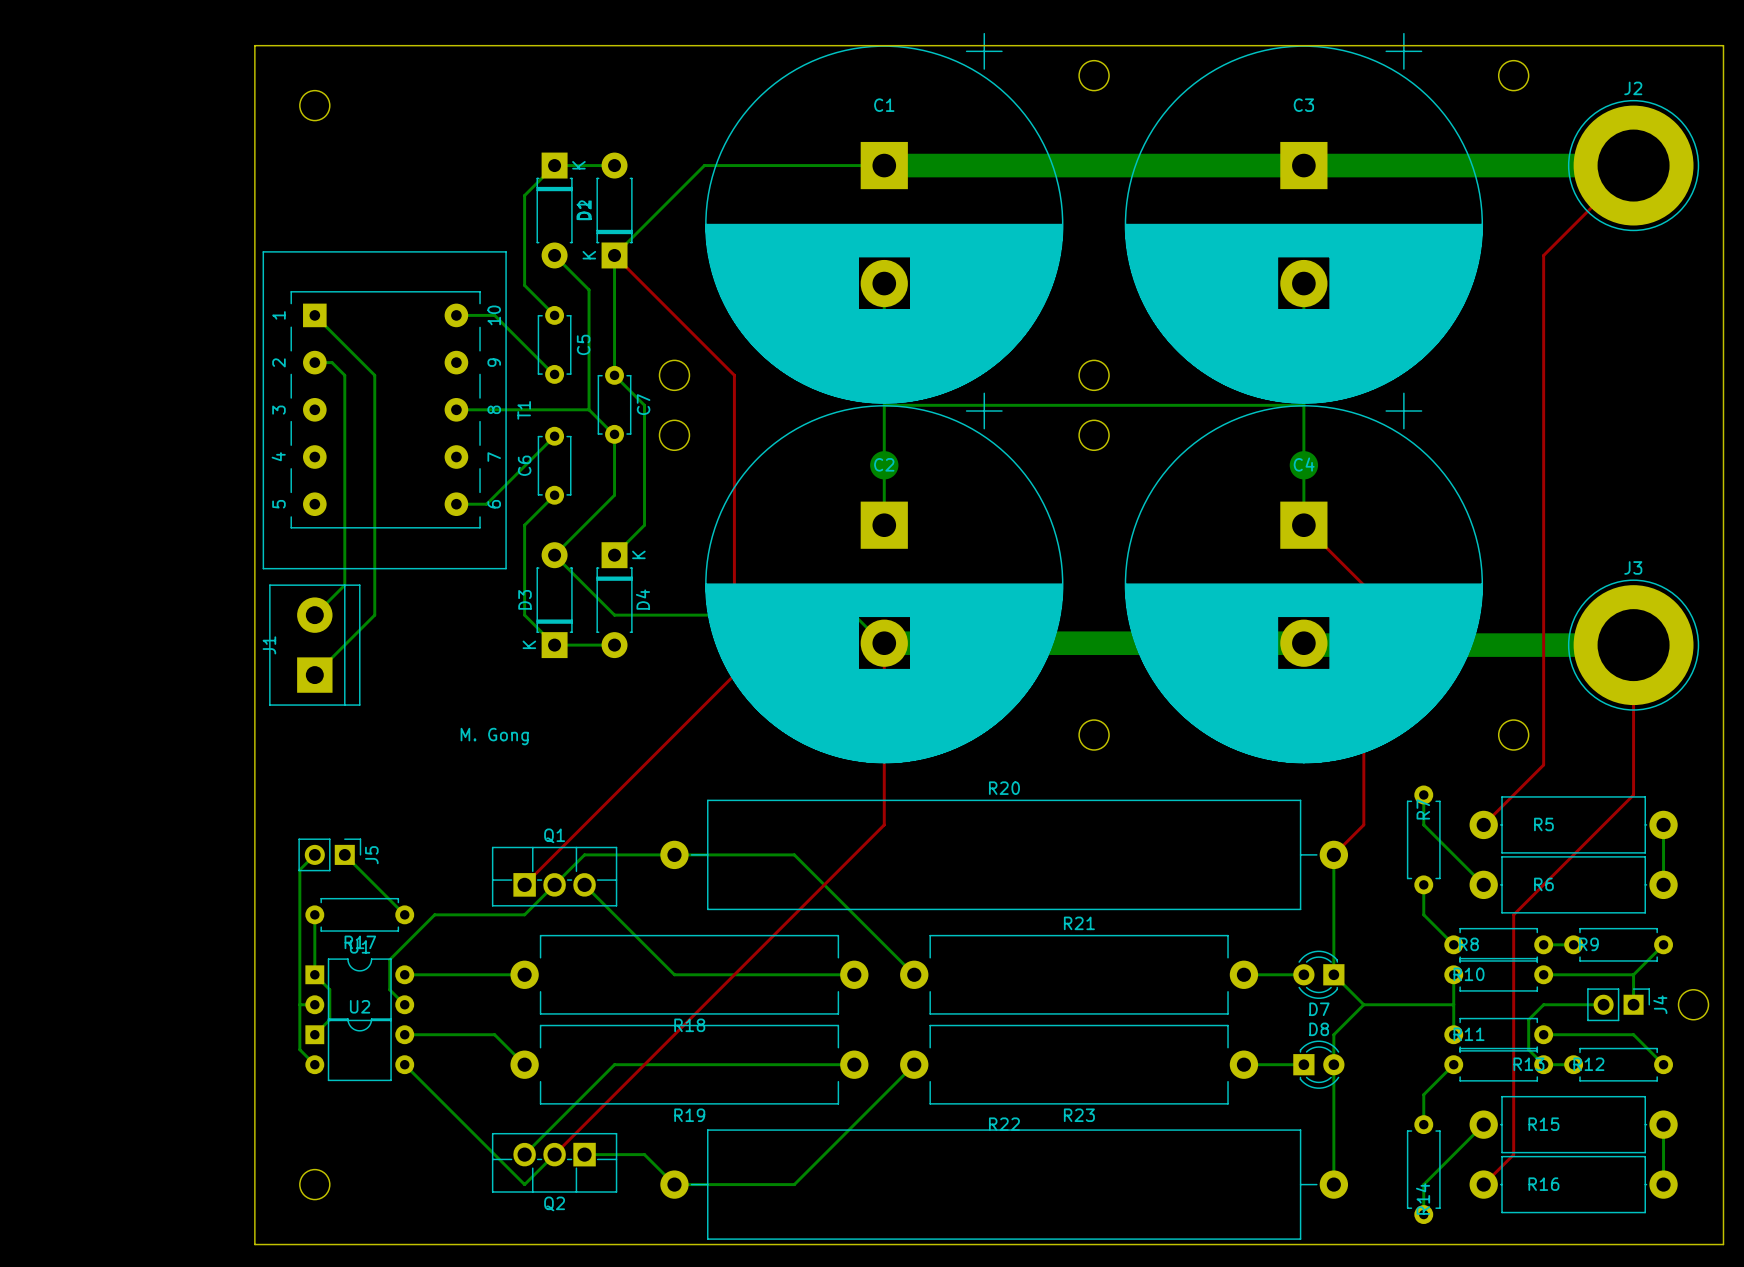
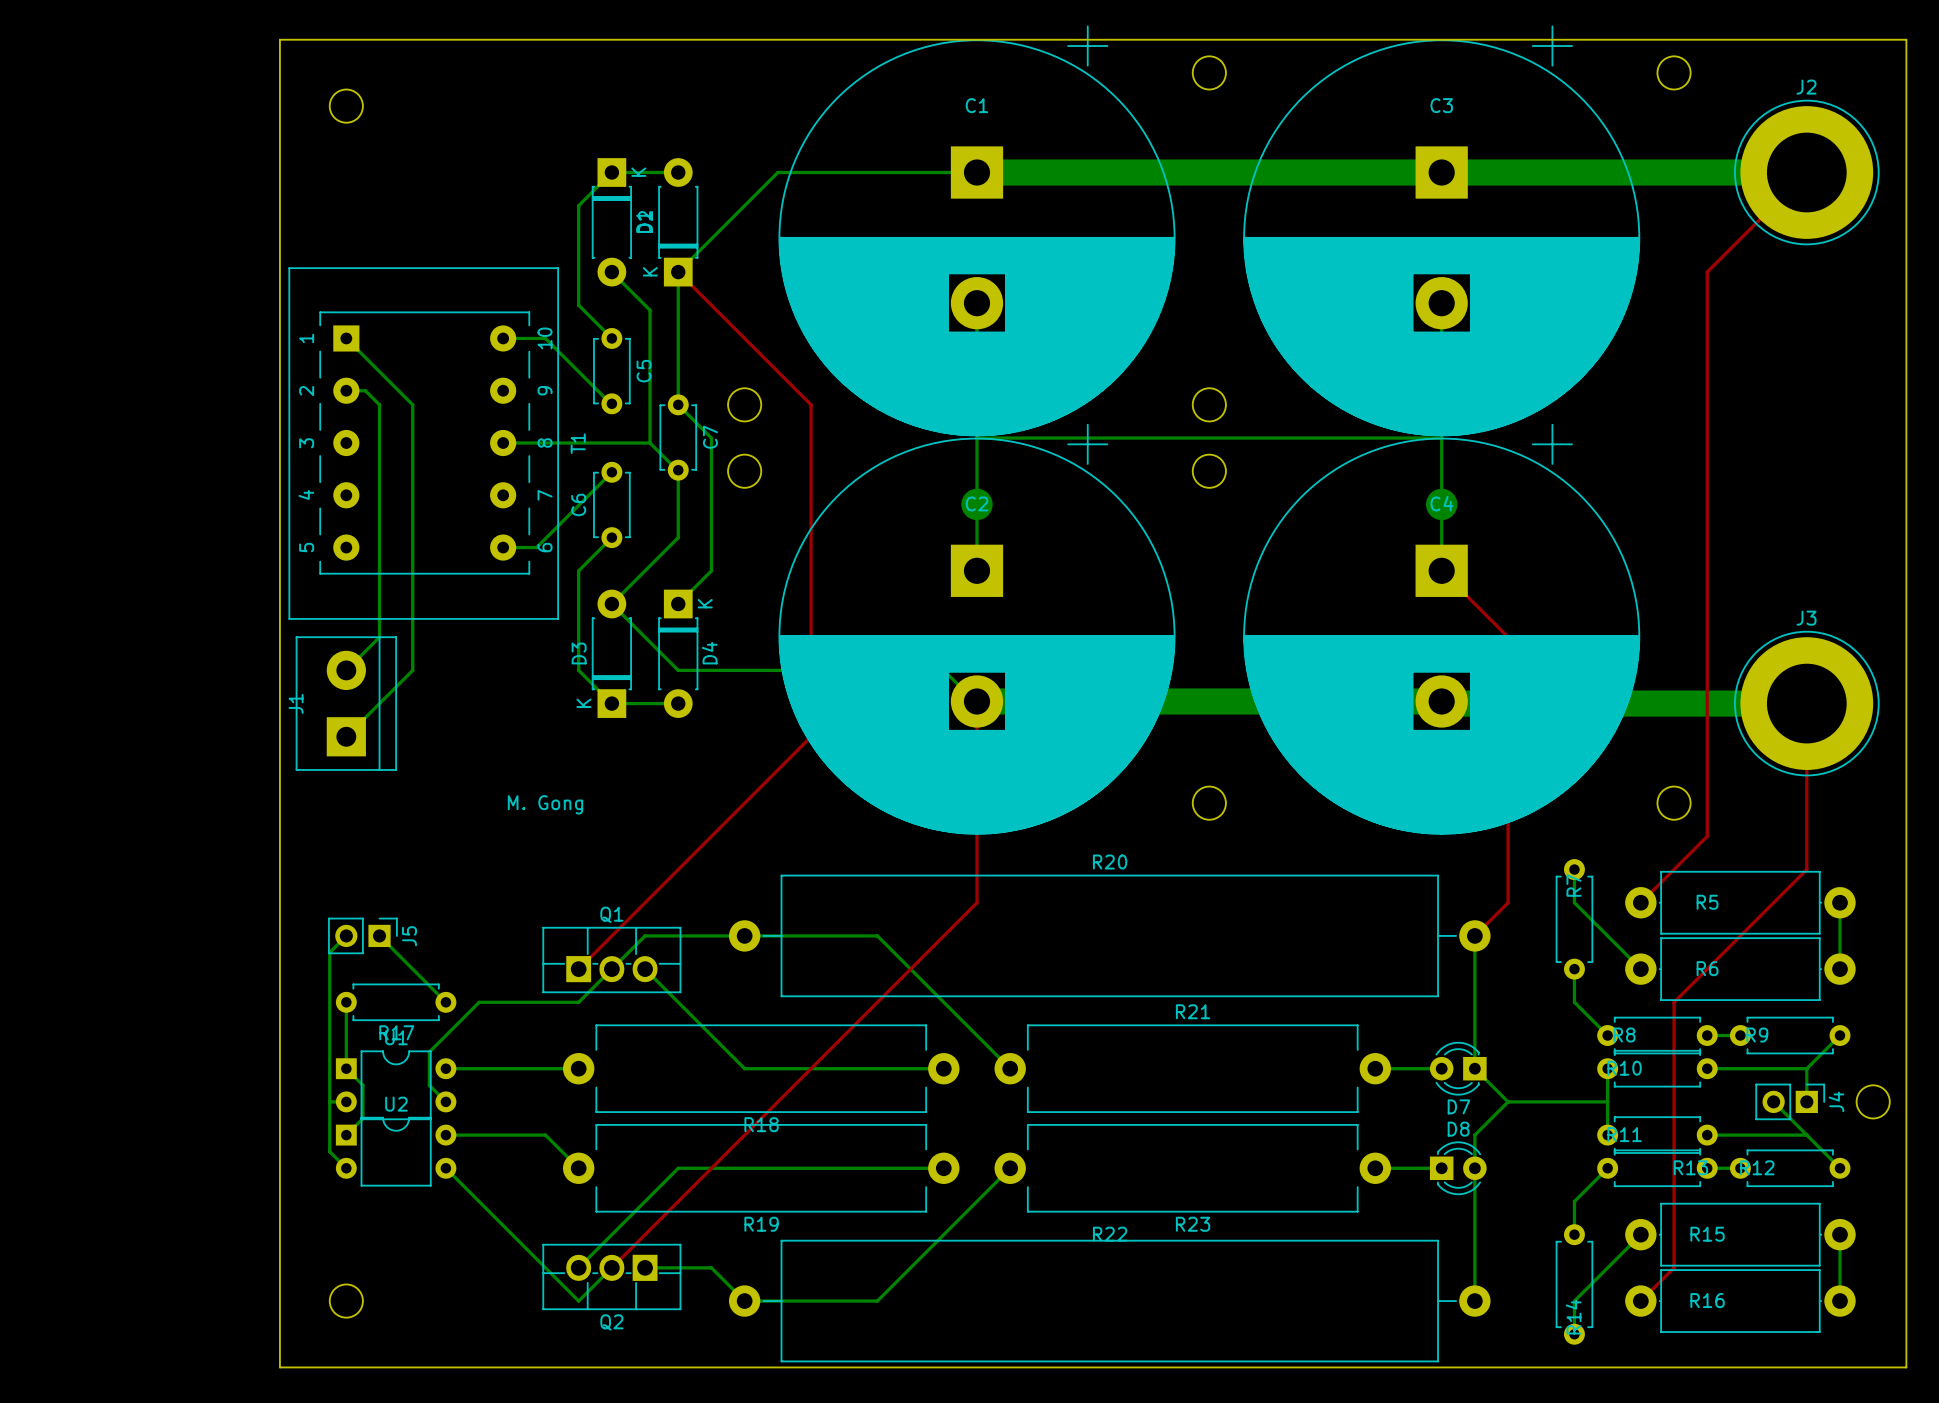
bottom track: (1603, 1004) (1543, 1004) (1528, 1019) (1528, 1049) (1543, 1064) -> (1773, 1101) (1806, 1135)

